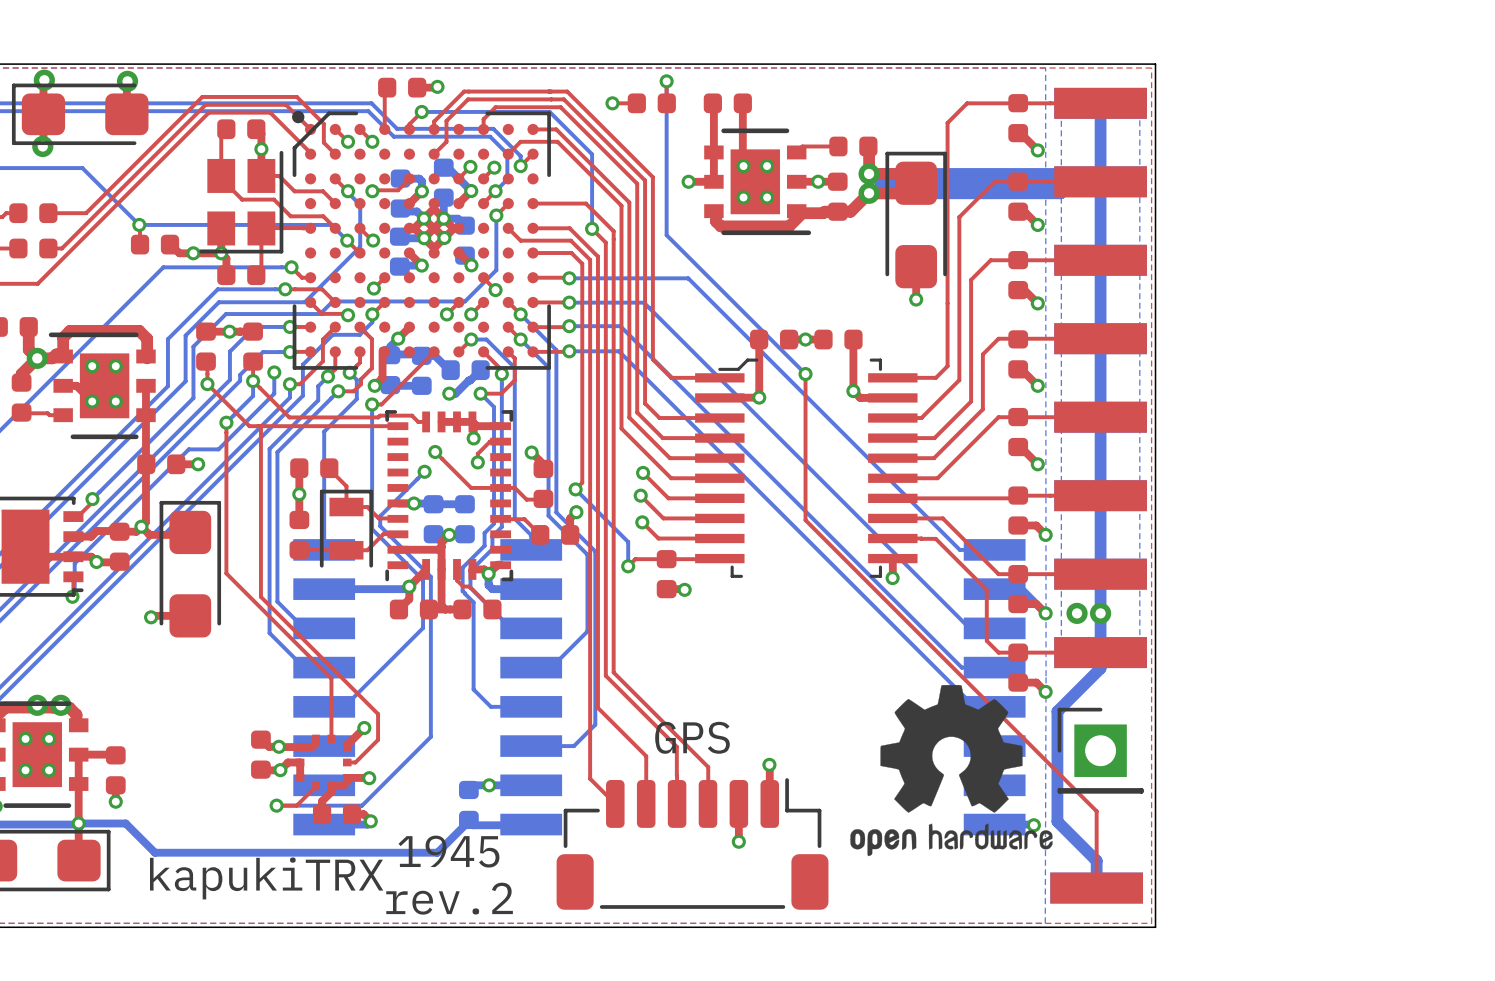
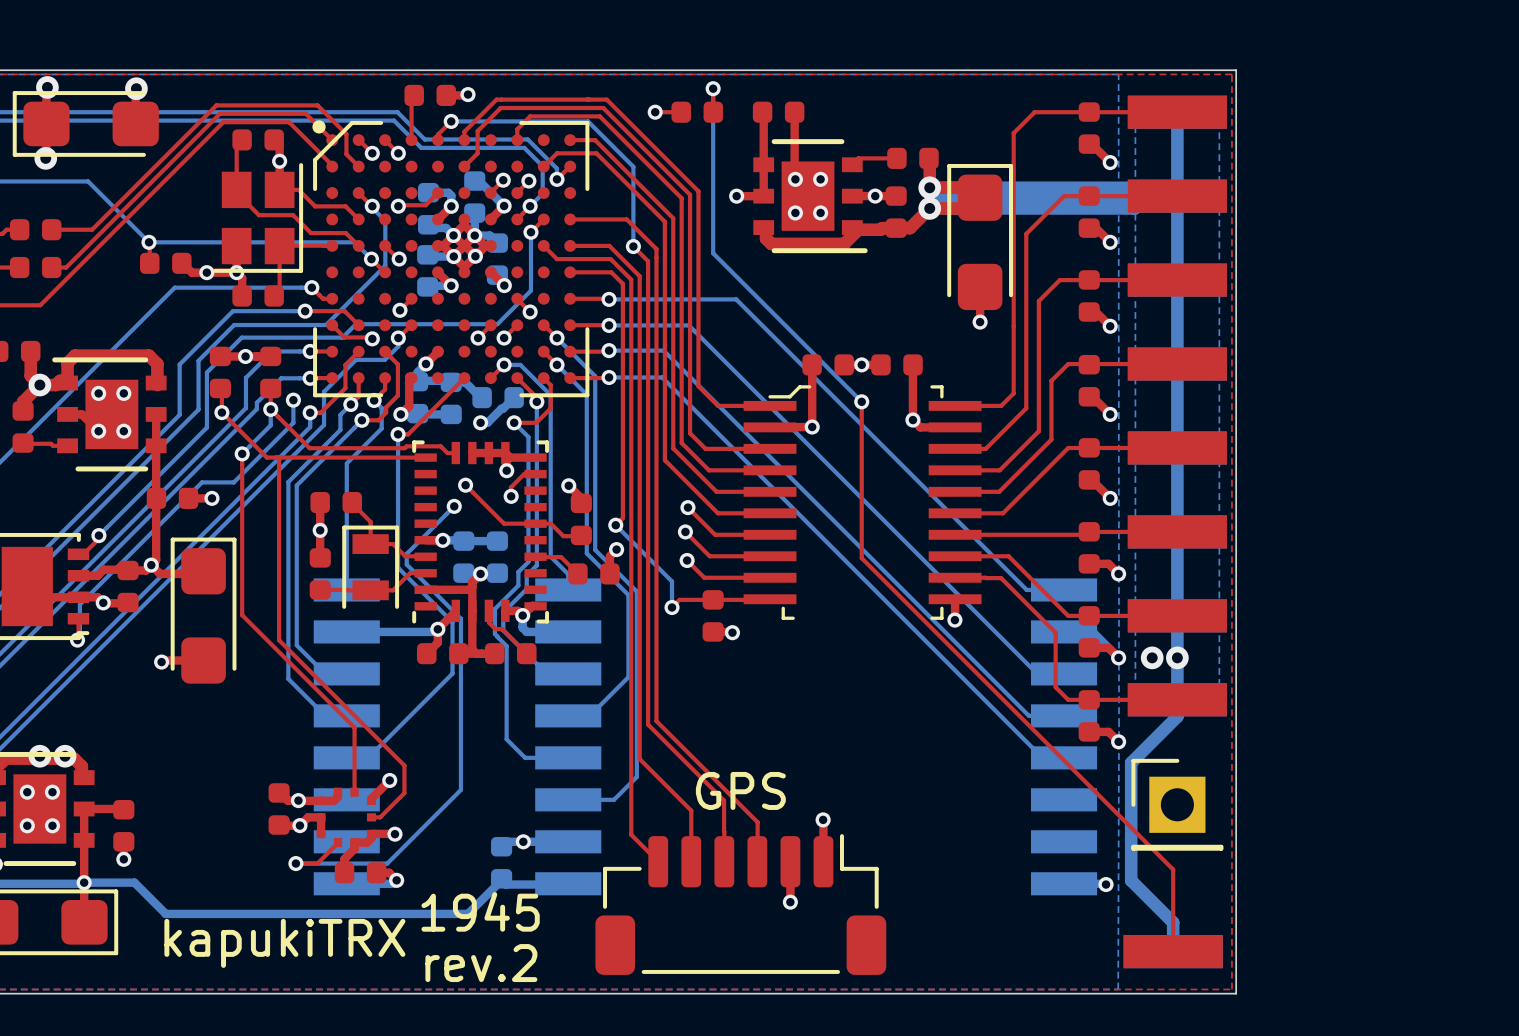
drawing: [850, 684, 1053, 857] -> none

